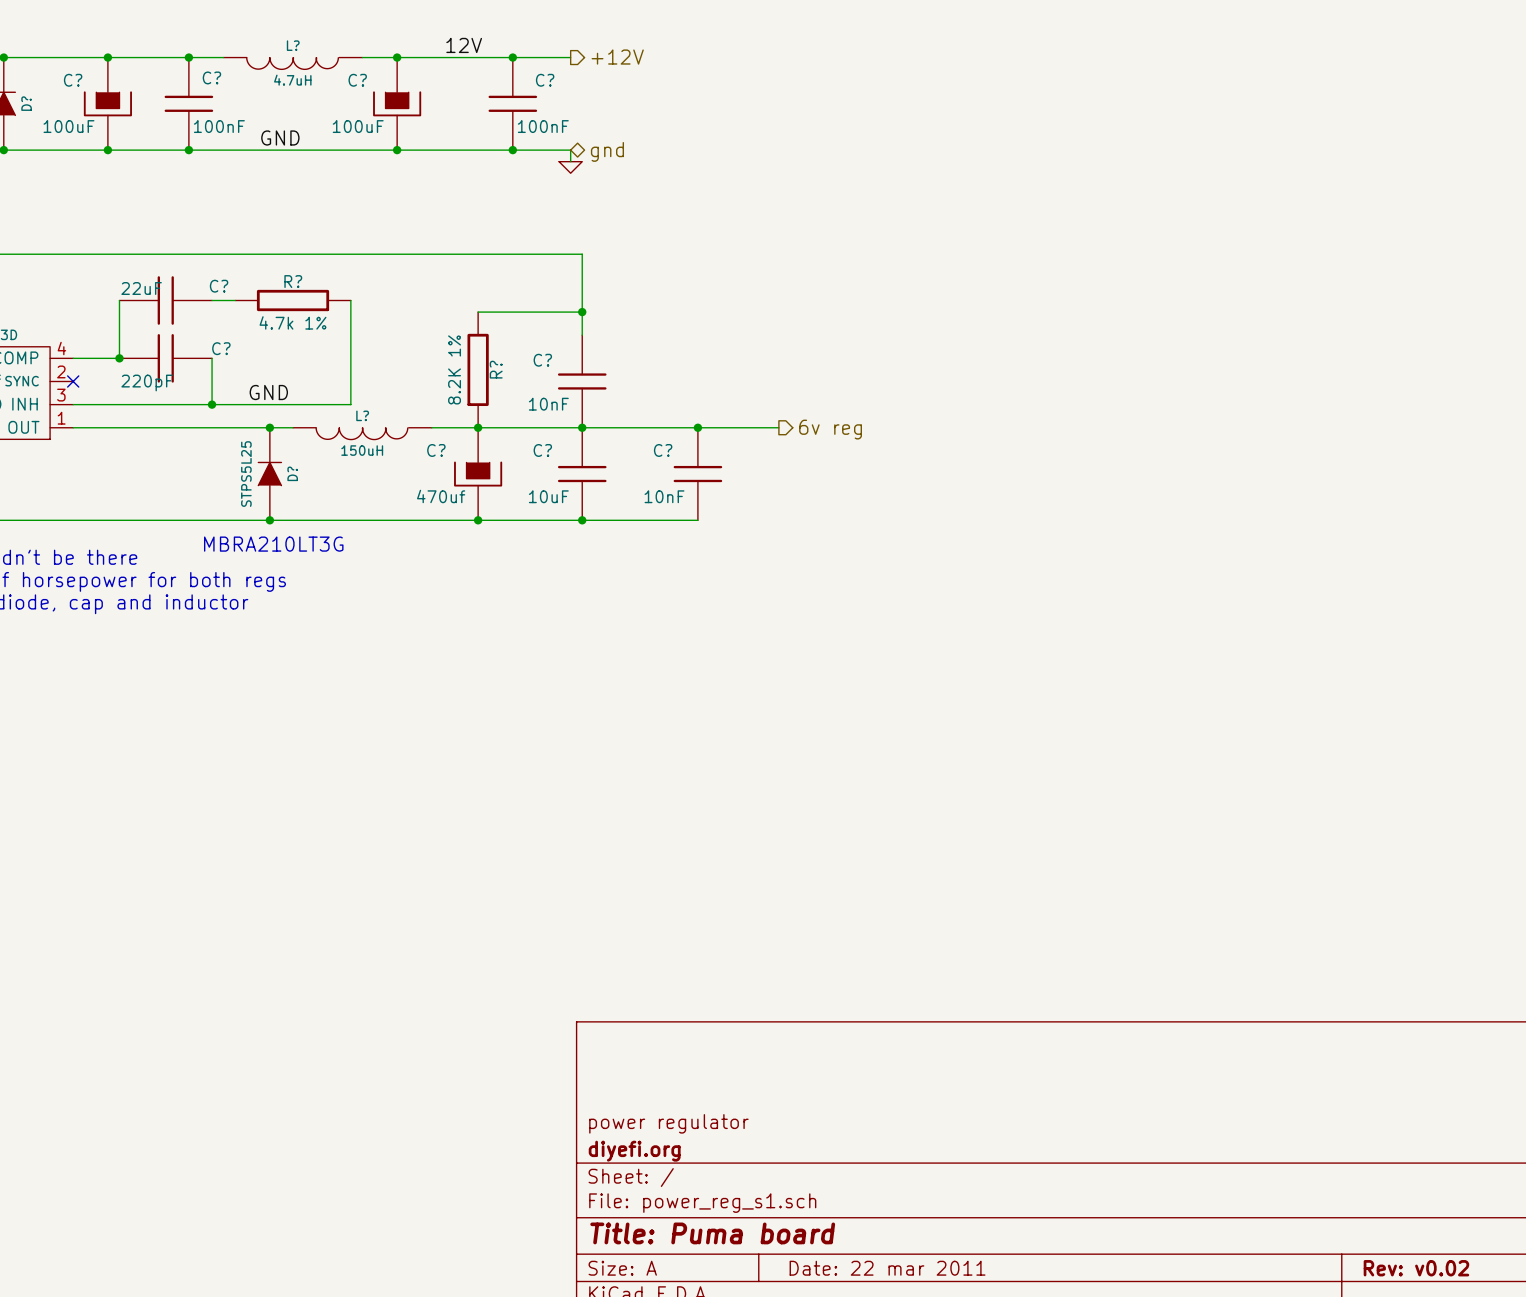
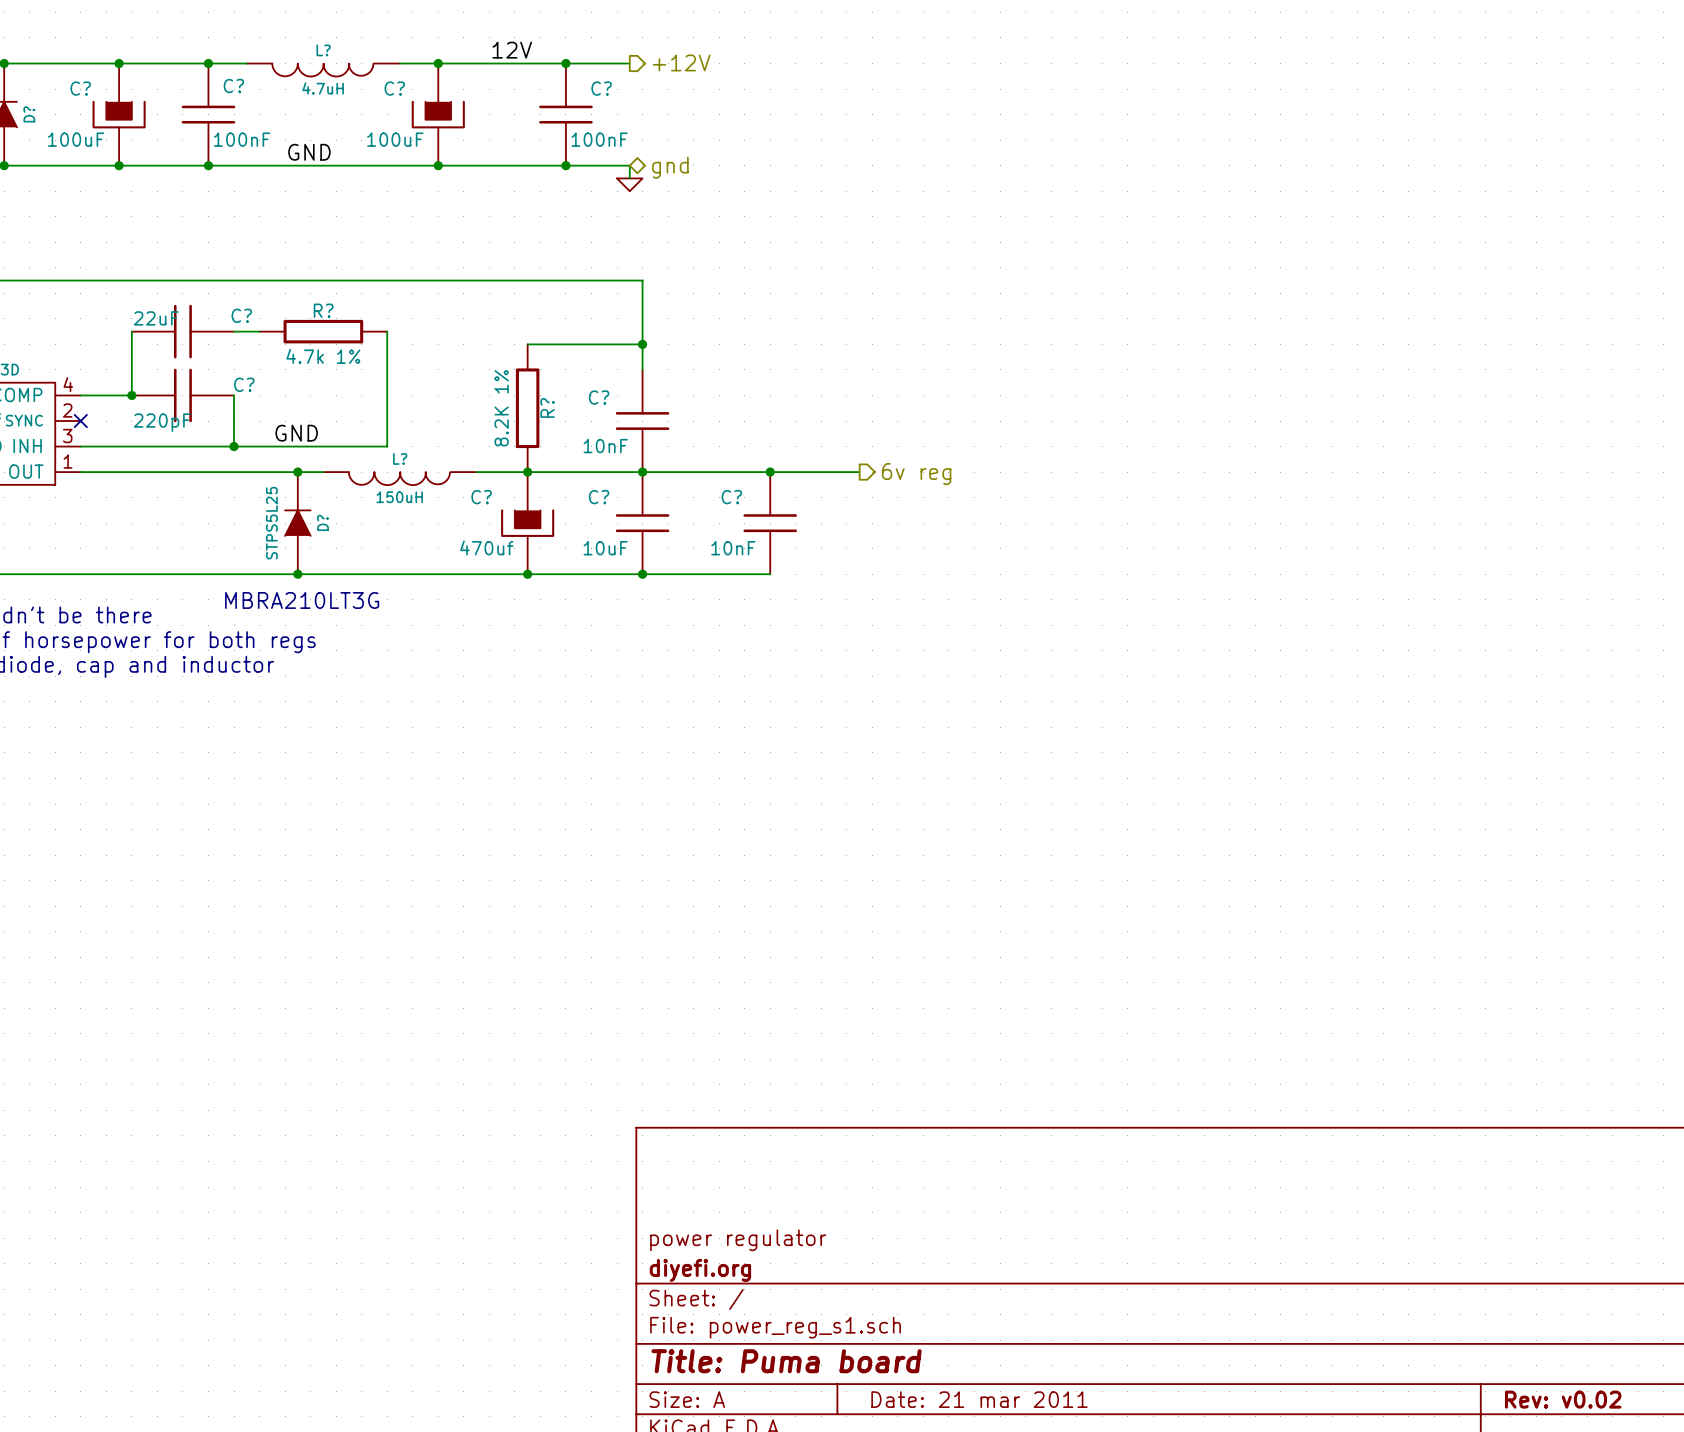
title block: Date: 22 mar 2011 (887, 1268) -> Date: 21 mar 2011 (979, 1399)

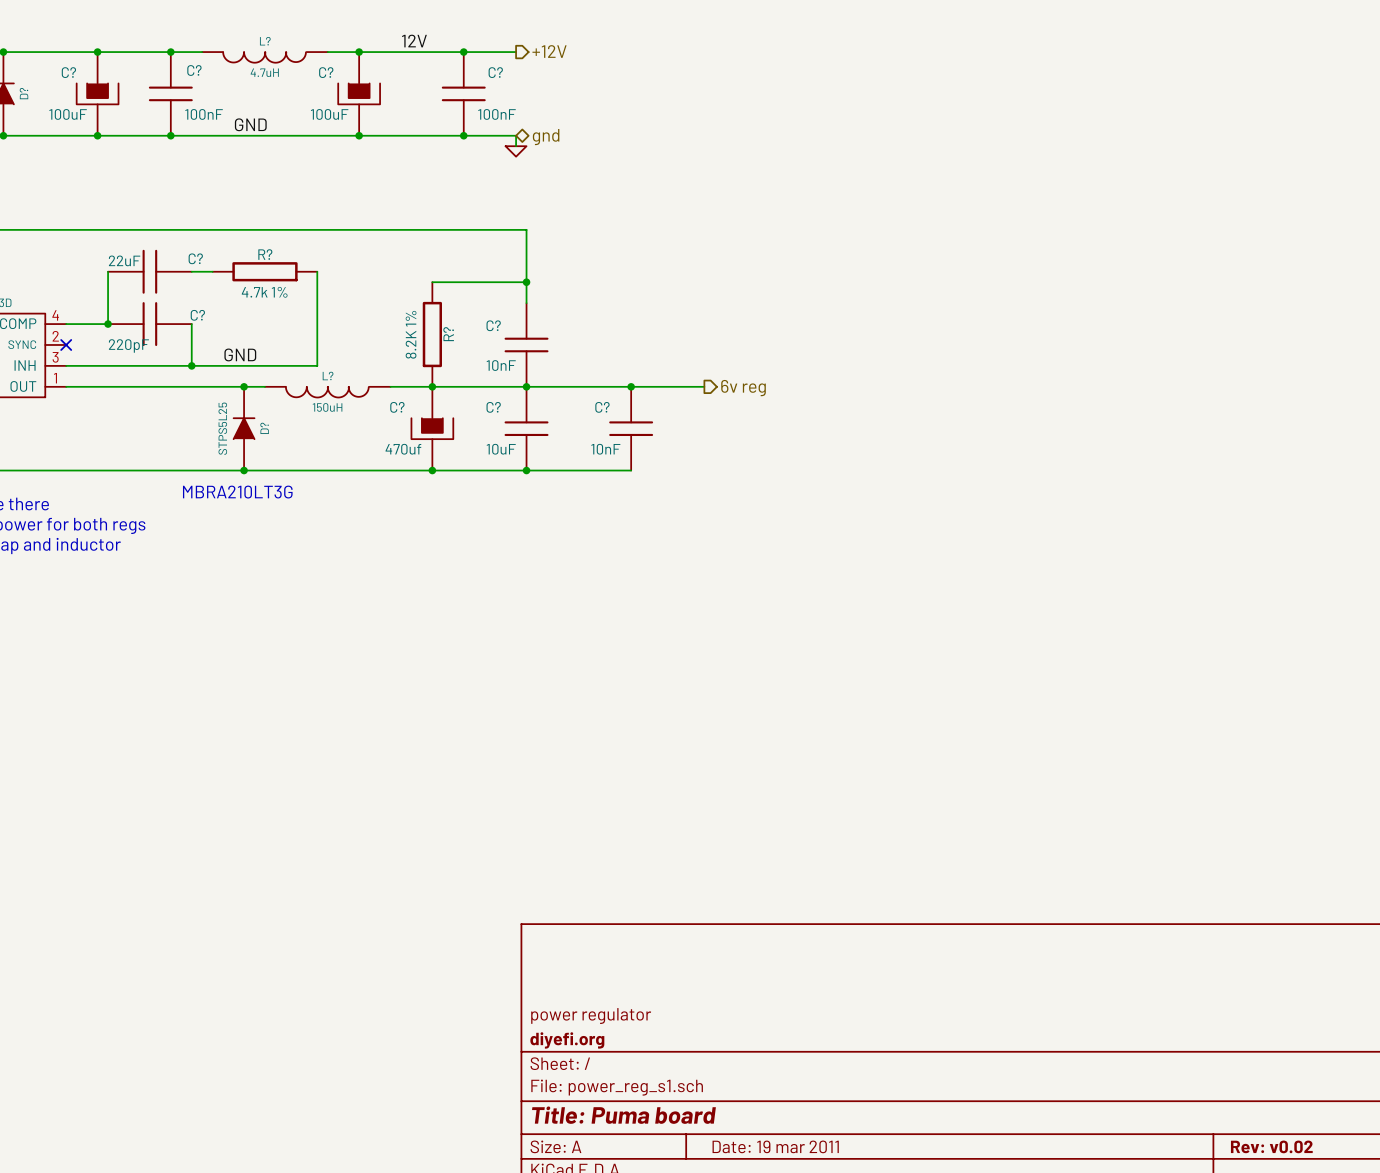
title block: Date: 21 mar 2011 (979, 1399) -> Date: 19 mar 2011 (775, 1146)

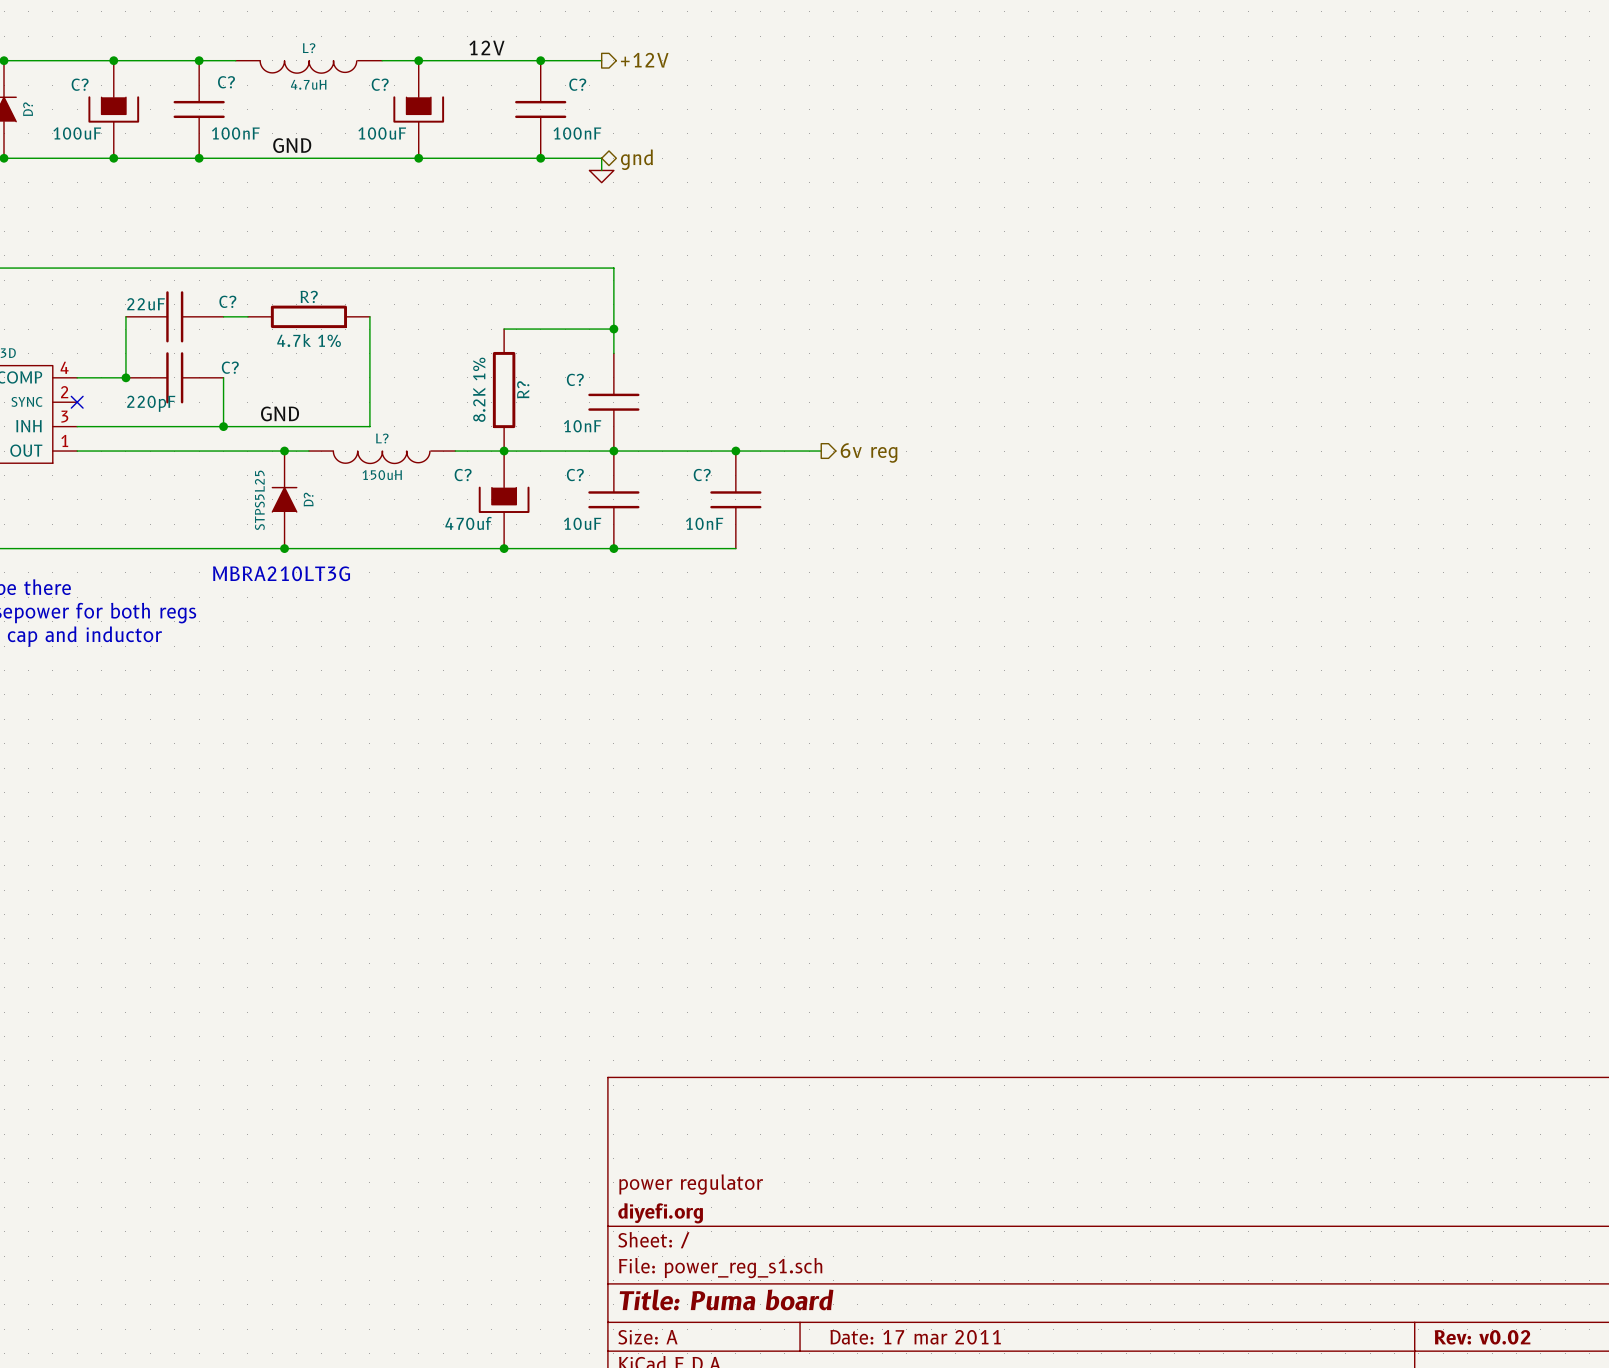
title block: Date: 19 mar 2011 (775, 1146) -> Date: 17 mar 2011 (915, 1337)

